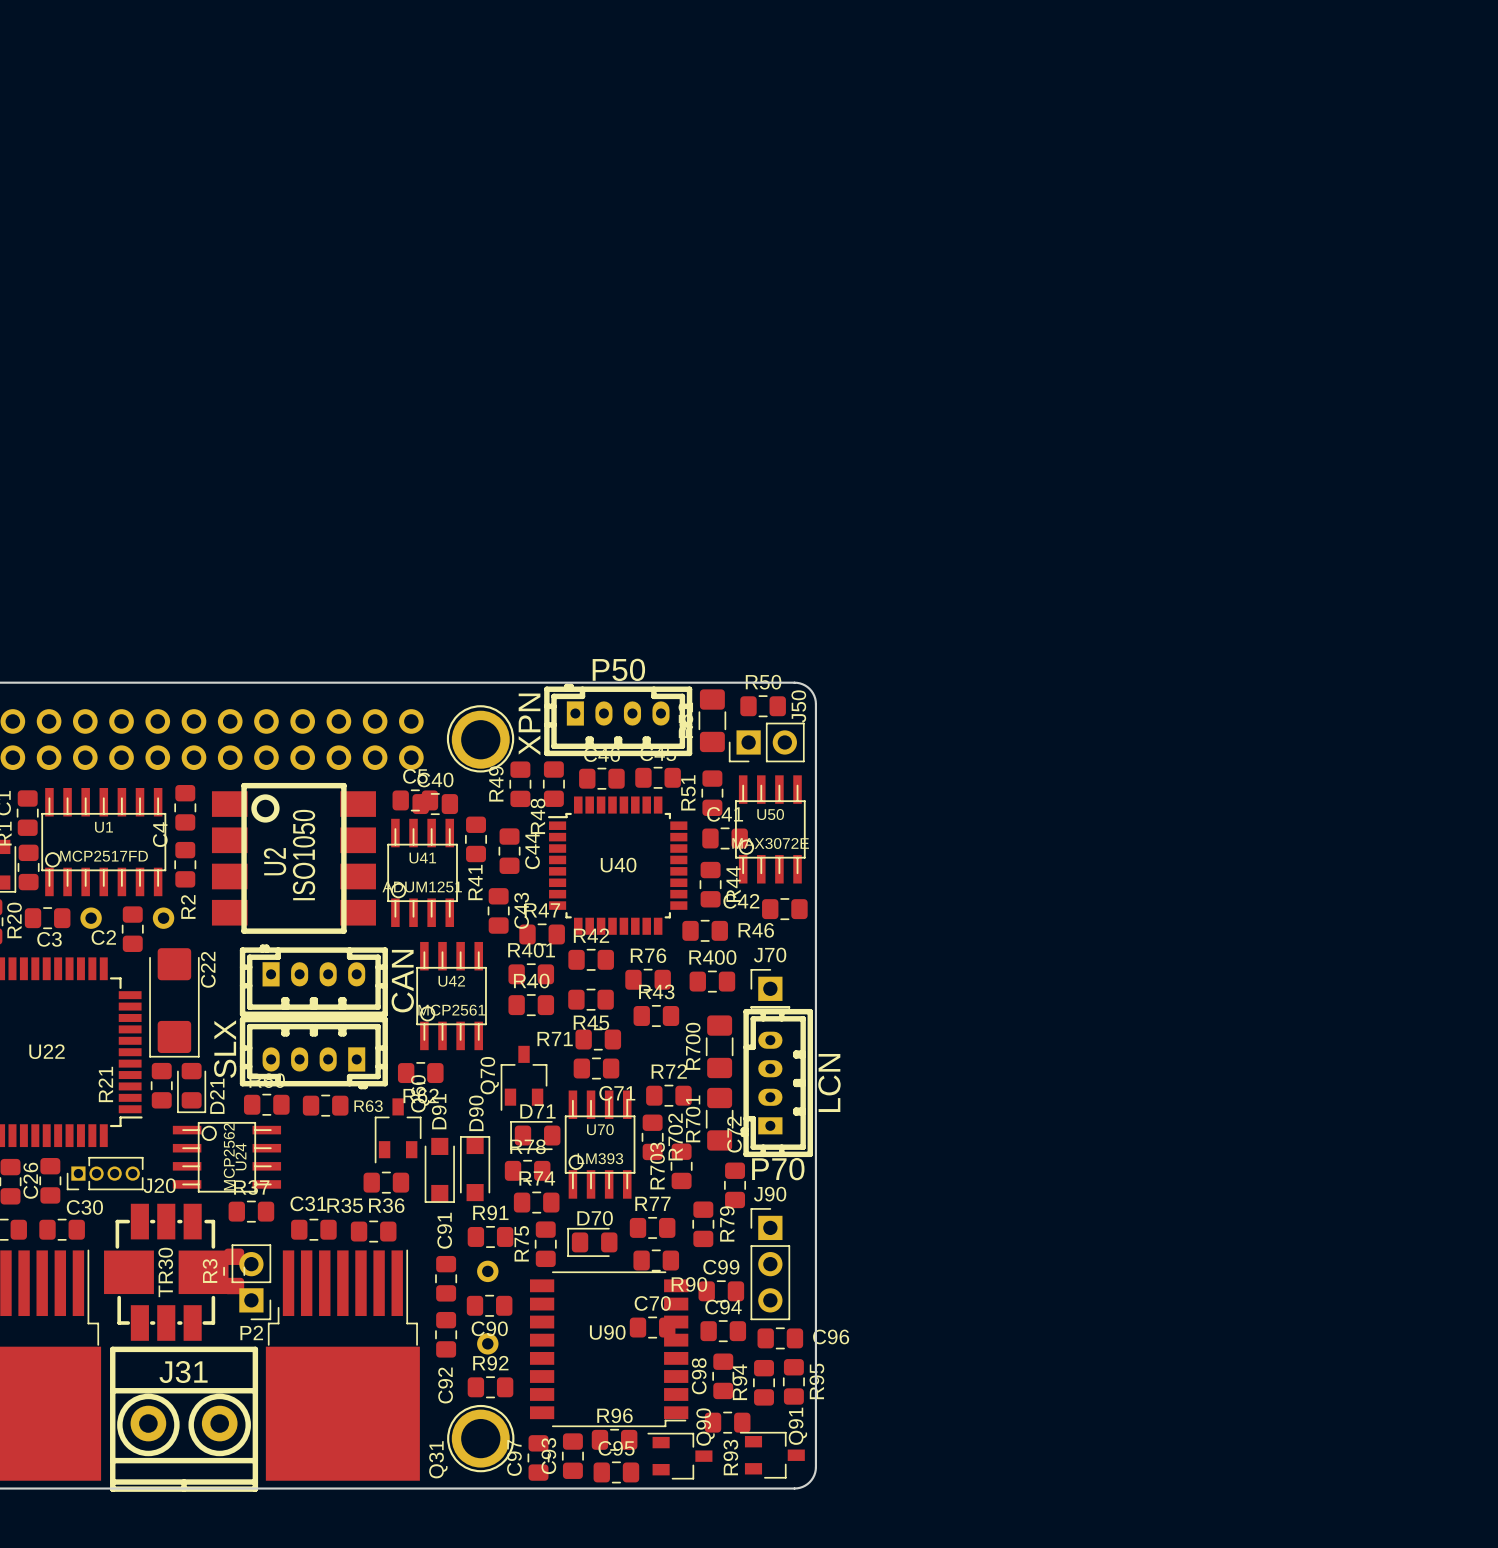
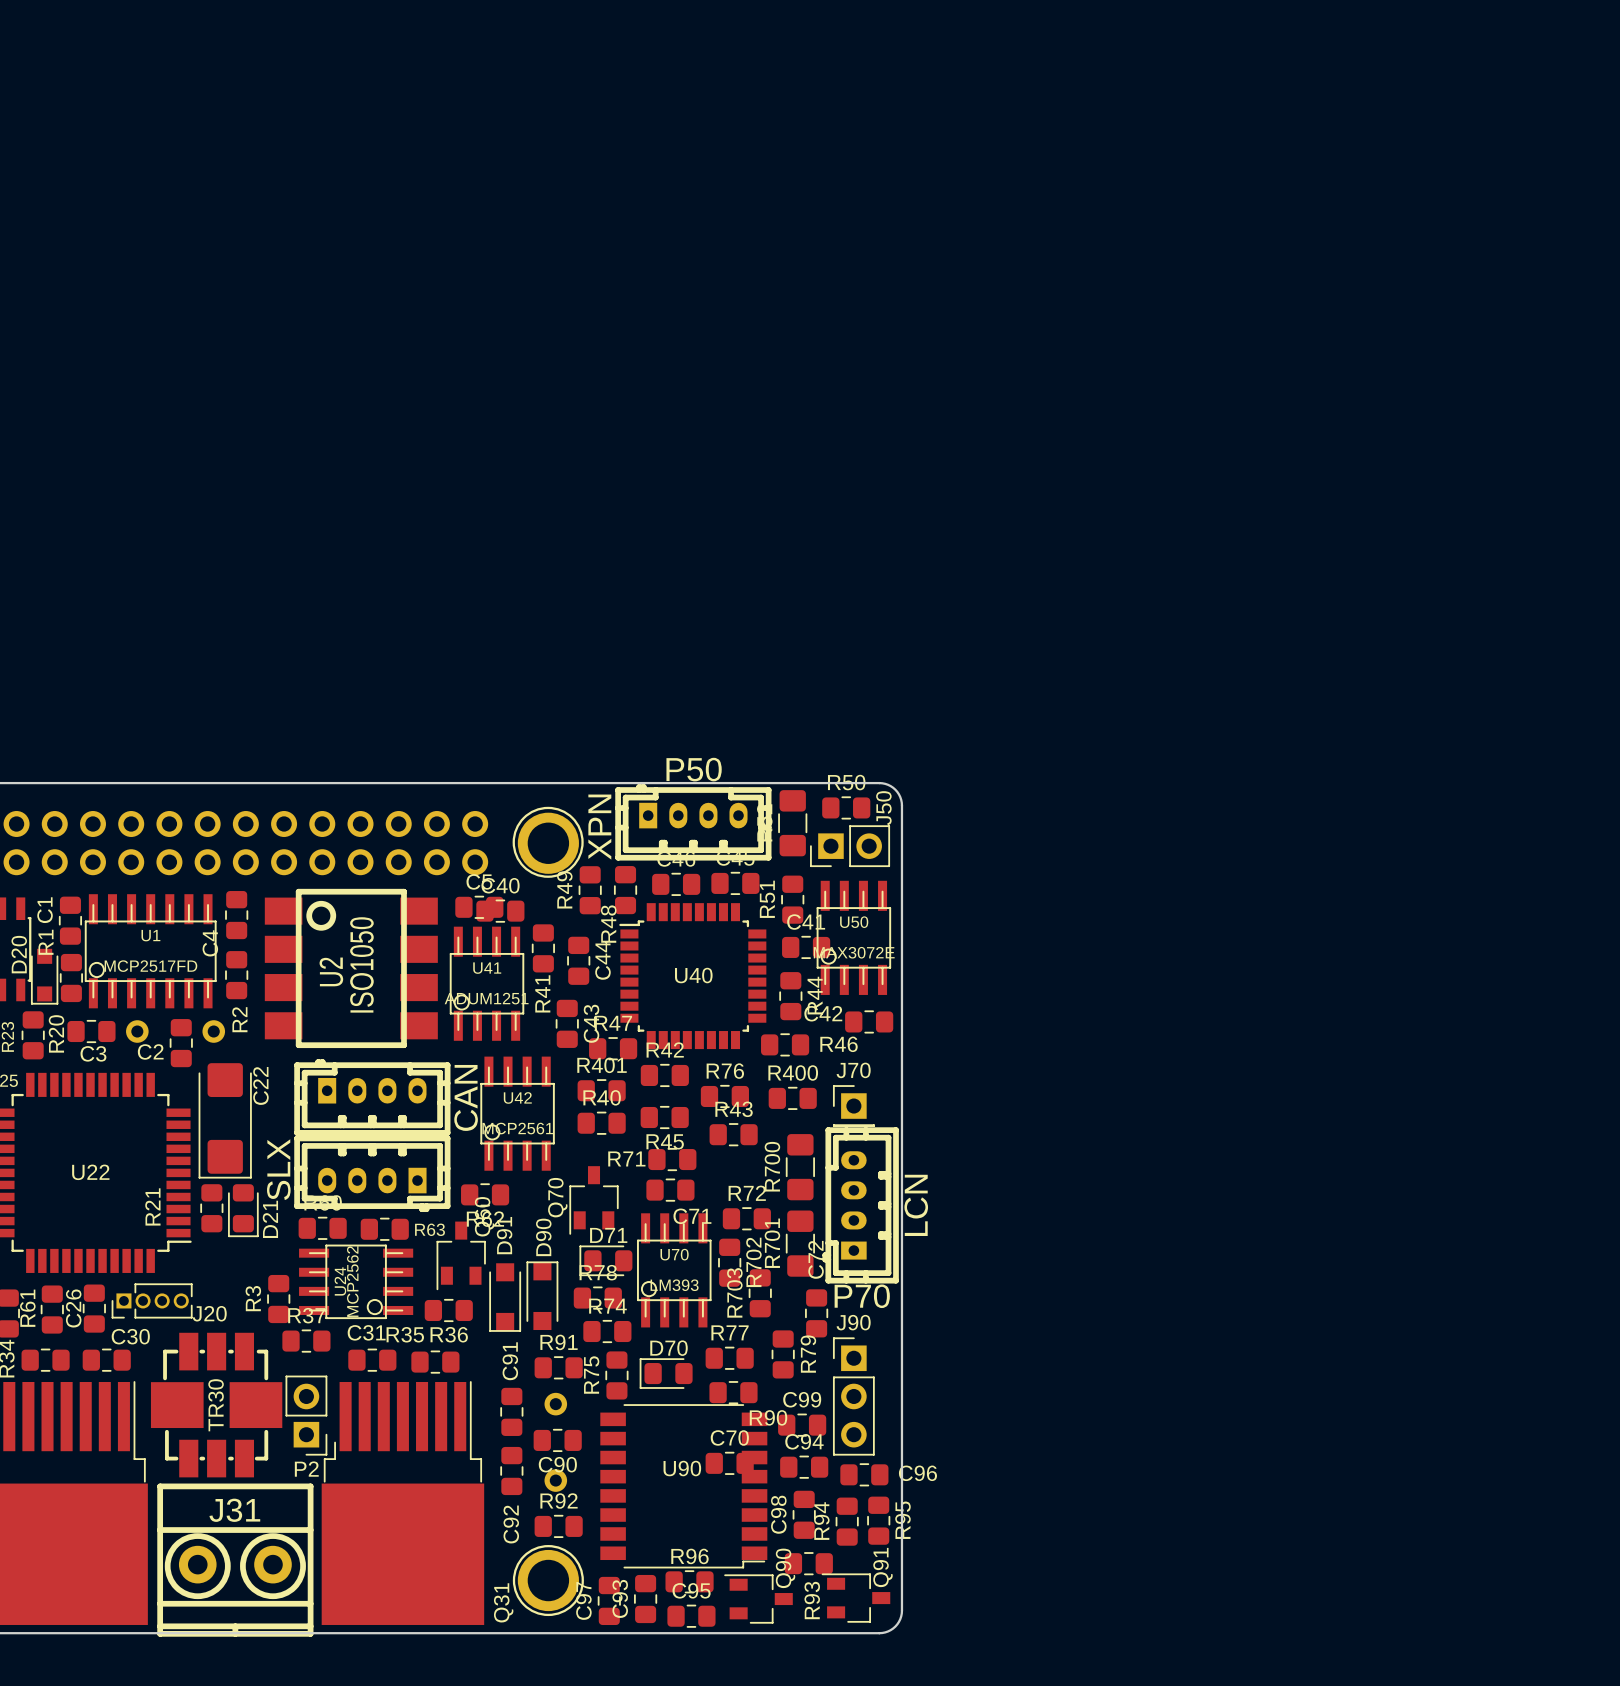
U24 rotation: 0° (226, 1157) -> 180° (356, 1281)
U24 position: (226, 1157) -> (356, 1281)
R3 position: (234, 1271) -> (278, 1299)

